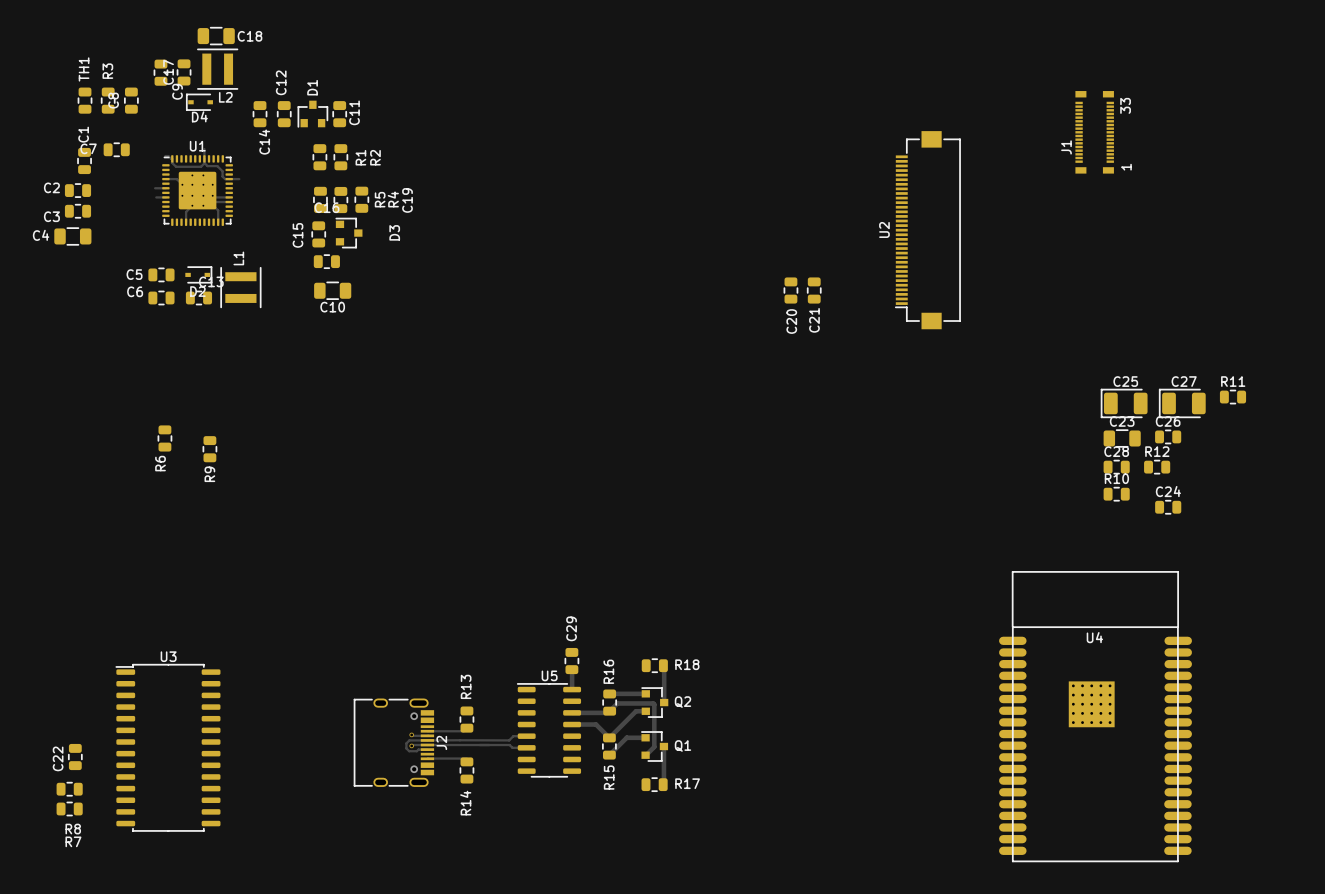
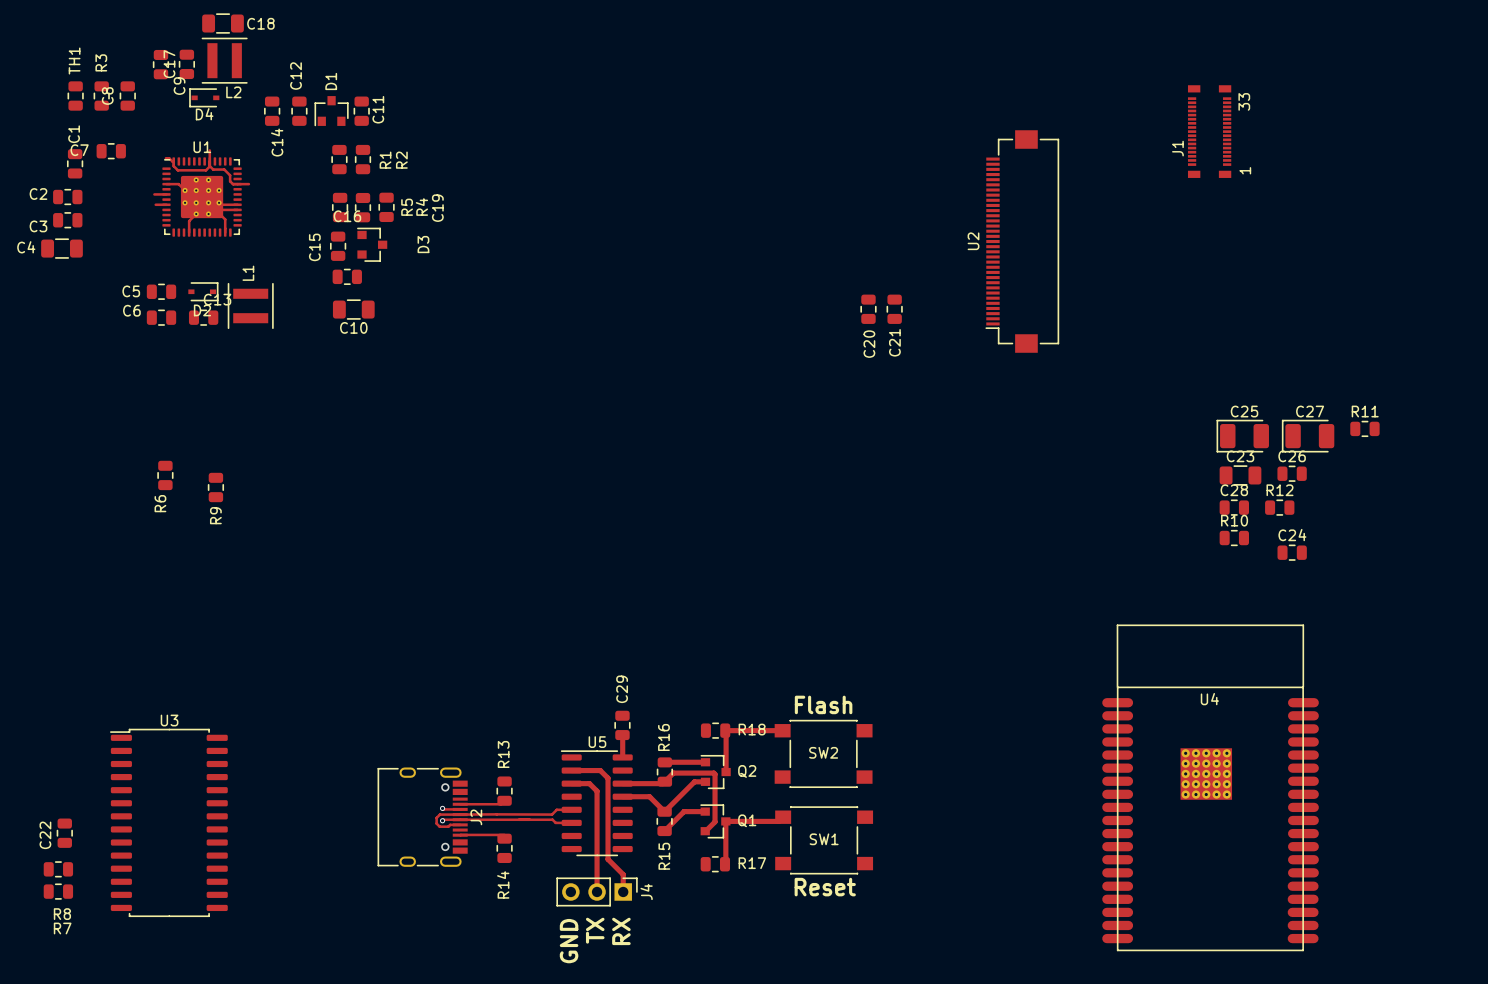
text: none -> Flash (823, 704)
track: none -> (725, 730) (782, 730)
SW2: none -> (823, 753)
track: none -> (571, 770) (600, 770) (608, 778) (608, 859) (623, 874) (623, 891)
track: none -> (571, 783) (589, 783) (597, 791) (597, 891)
track: none -> (783, 817) (778, 821) (725, 821)
SW1: none -> (824, 840)
text: none -> Reset (825, 887)
J4: none -> (597, 891)
text: none -> TX (595, 930)
text: none -> RX (621, 931)
text: none -> GND (569, 941)

